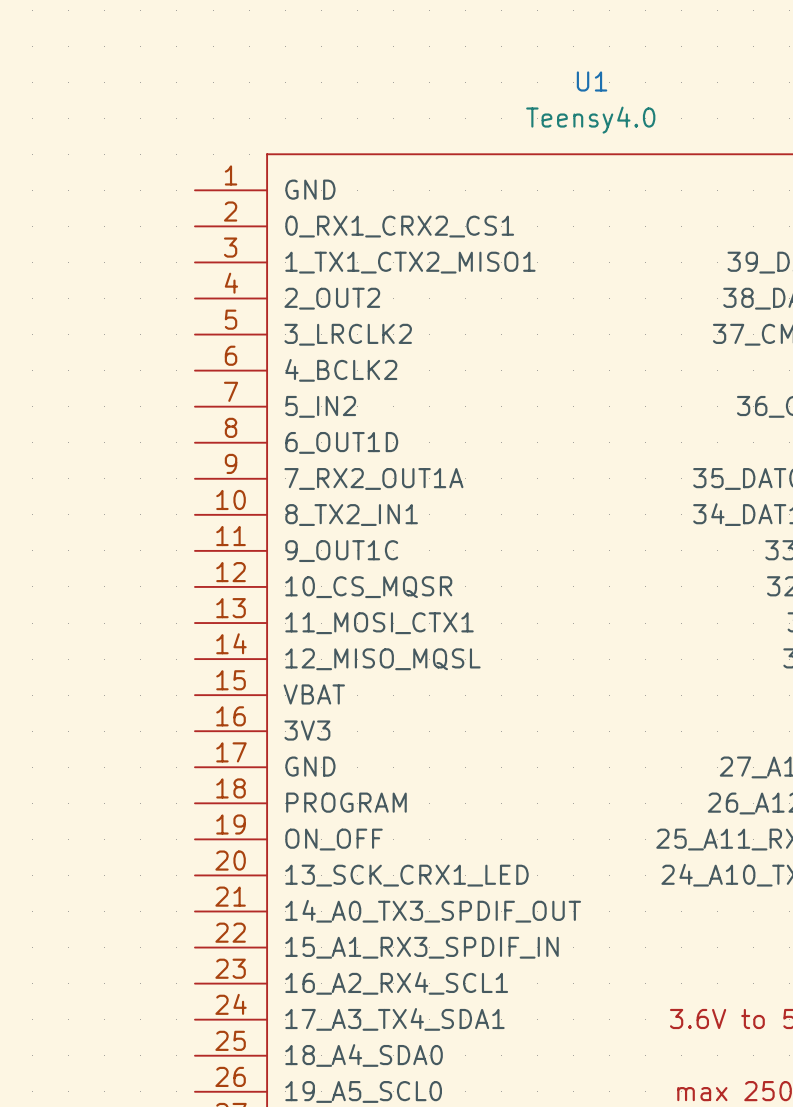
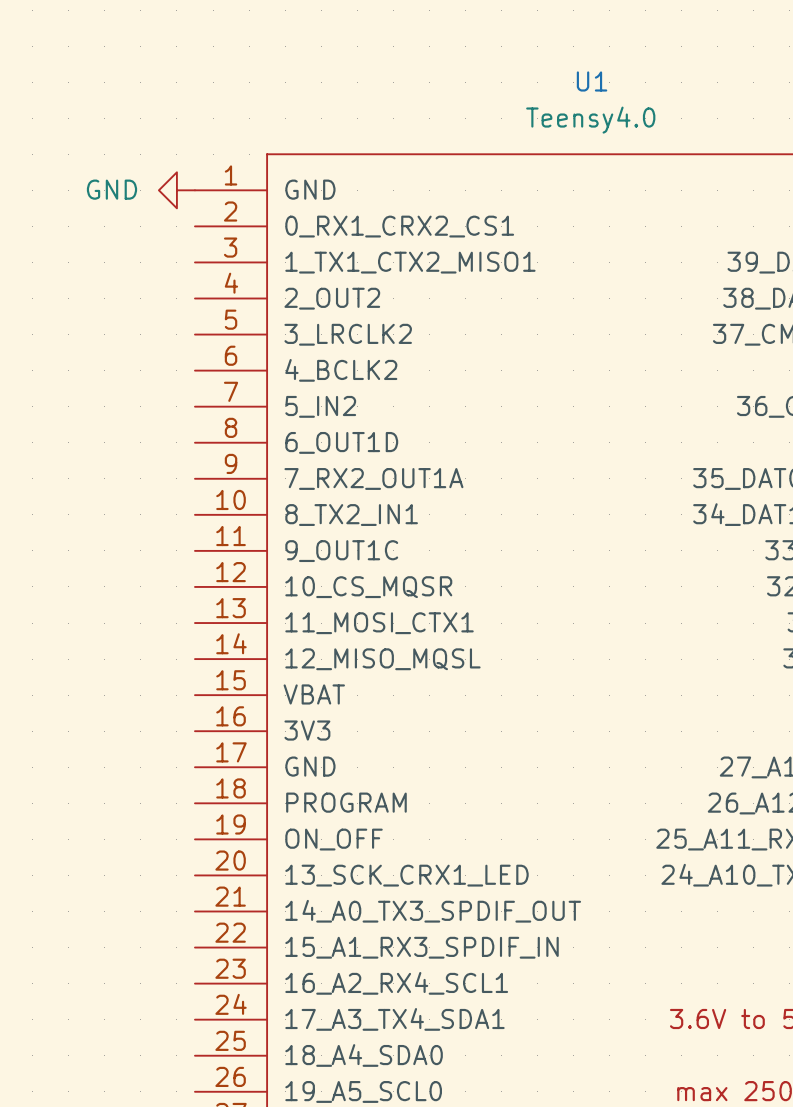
power symbol: none -> GND (176, 190)

